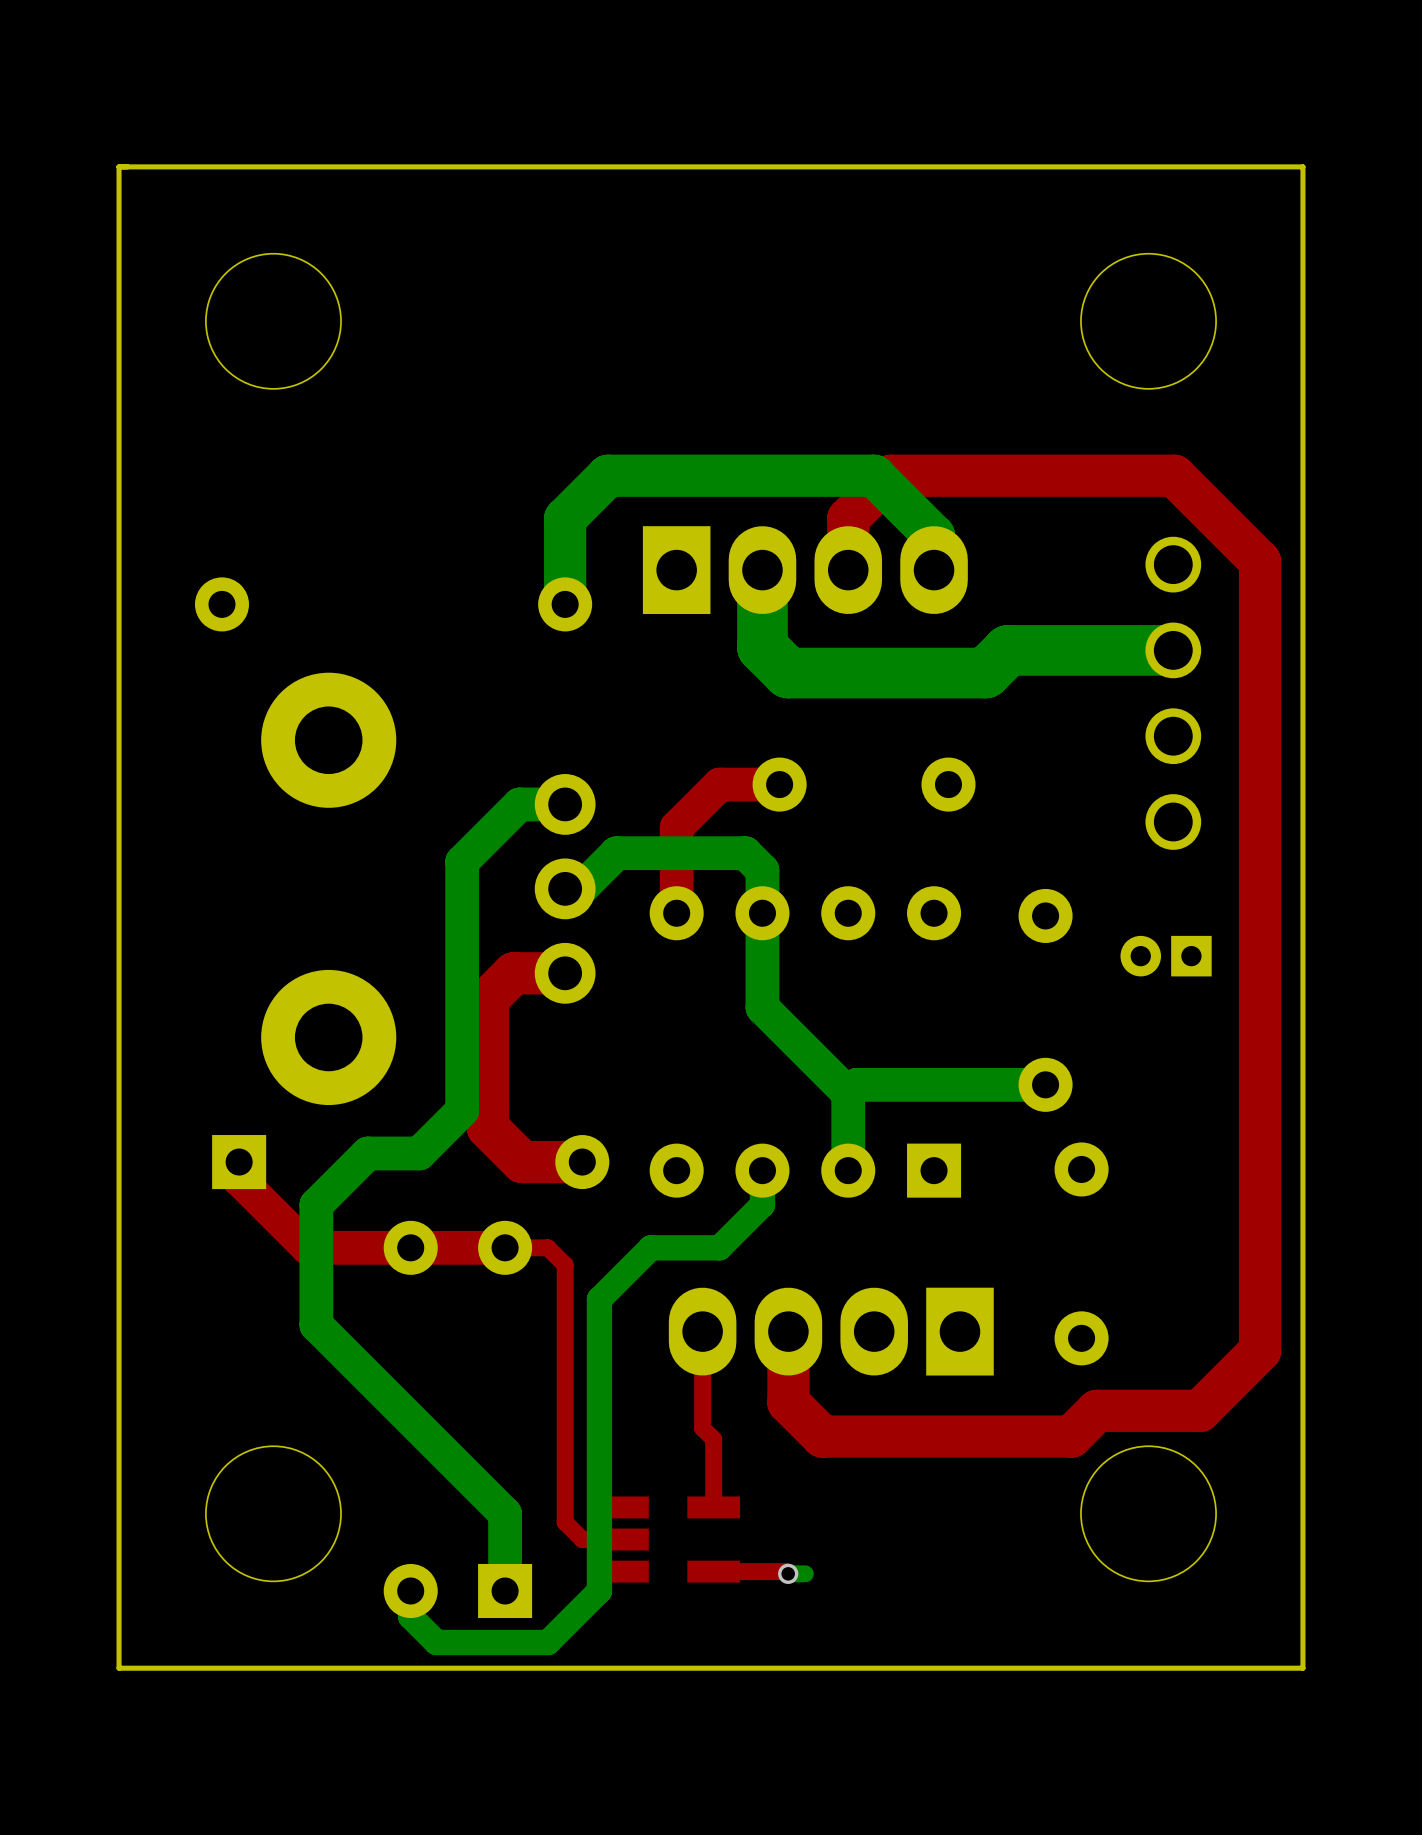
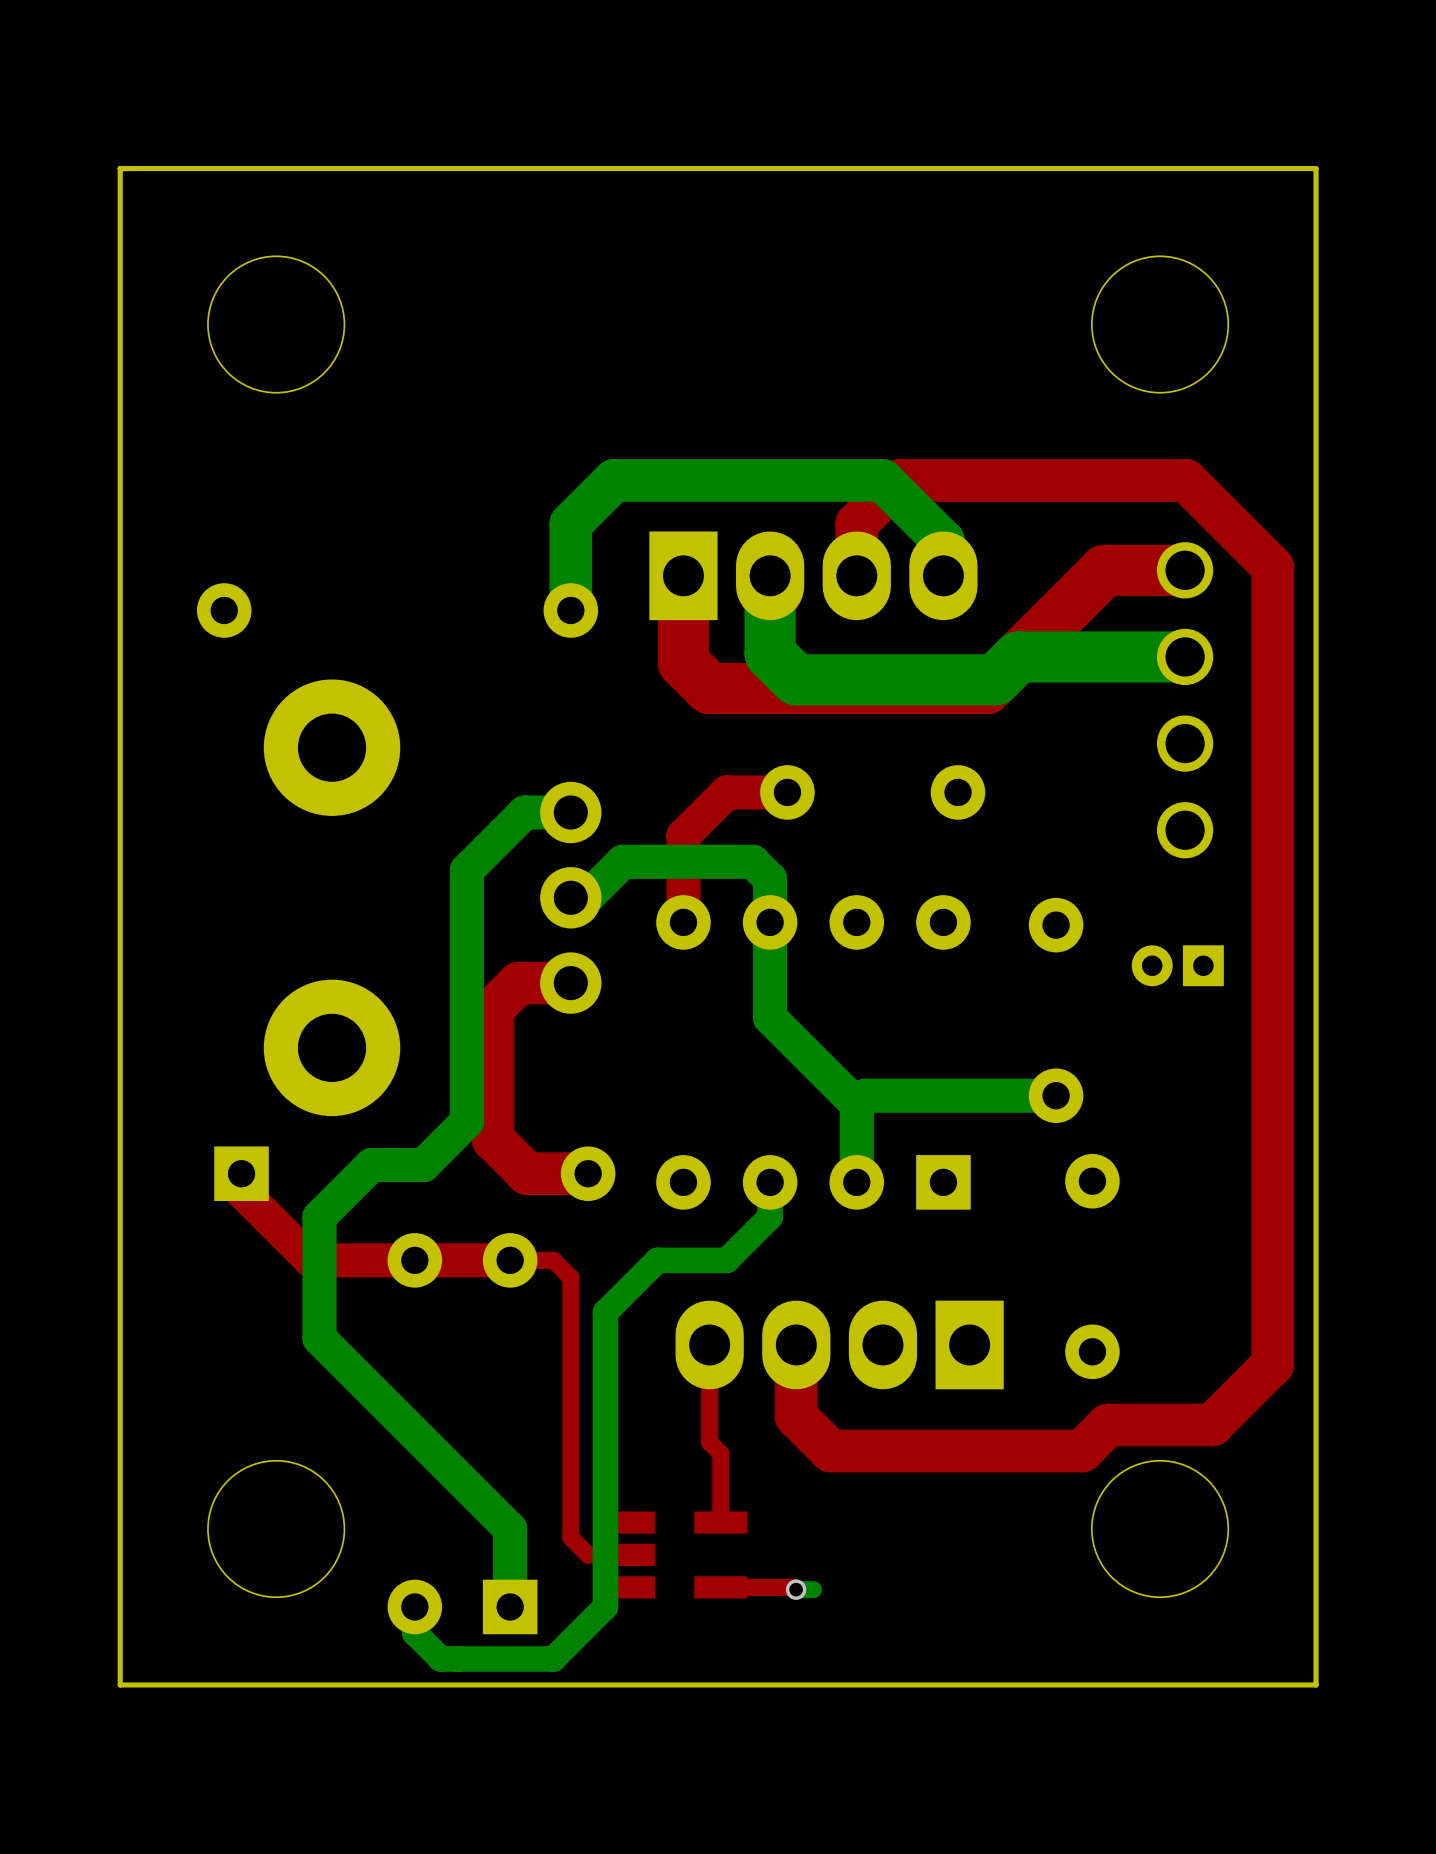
top track: none -> (1185, 570) (1104, 570) (986, 688) (709, 688) (683, 662) (683, 575)

